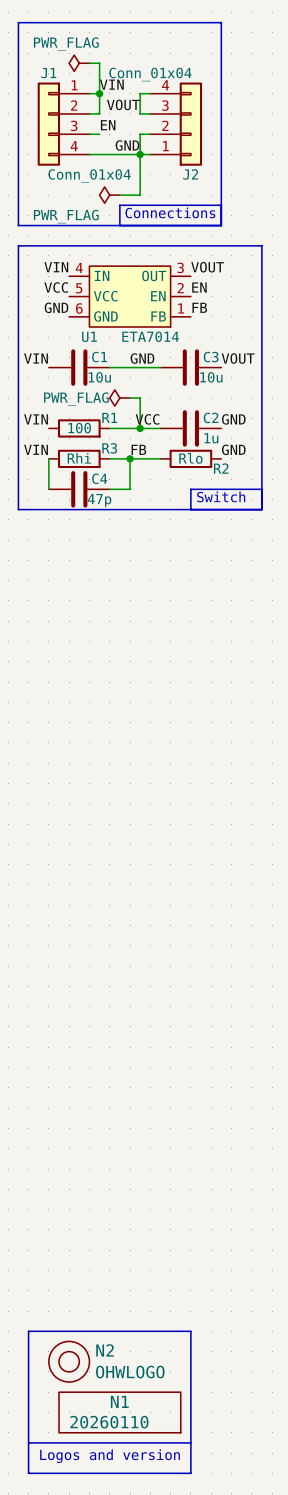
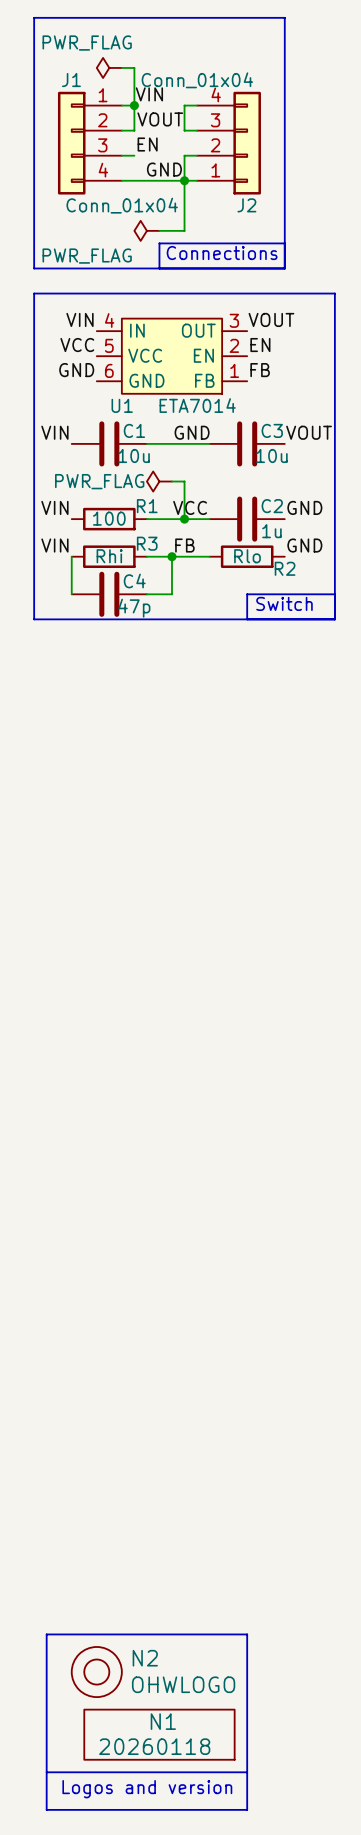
N1 value: 20260110 (109, 1422) -> 20260118 (154, 1746)

